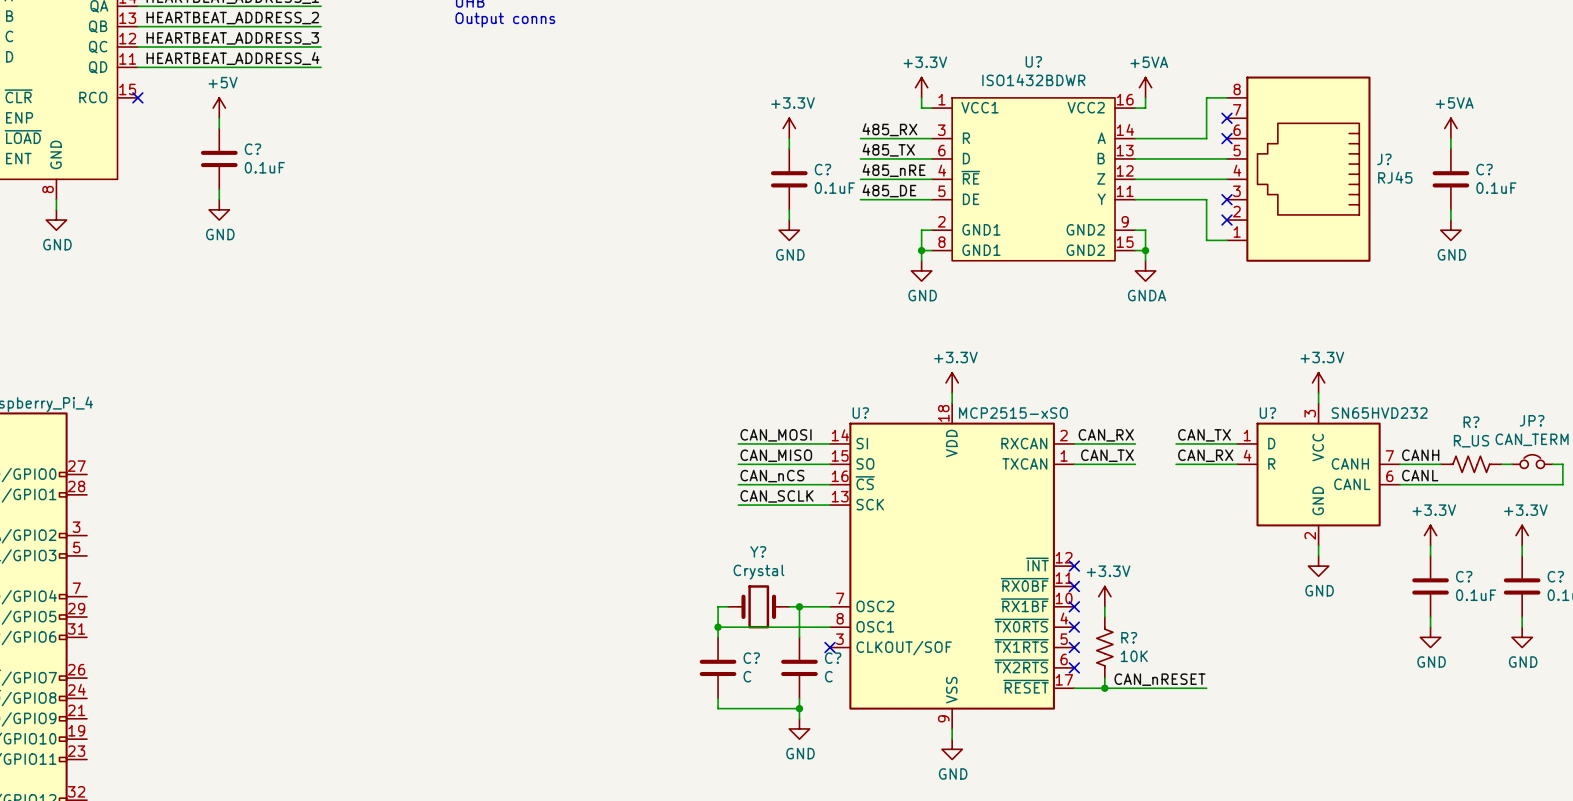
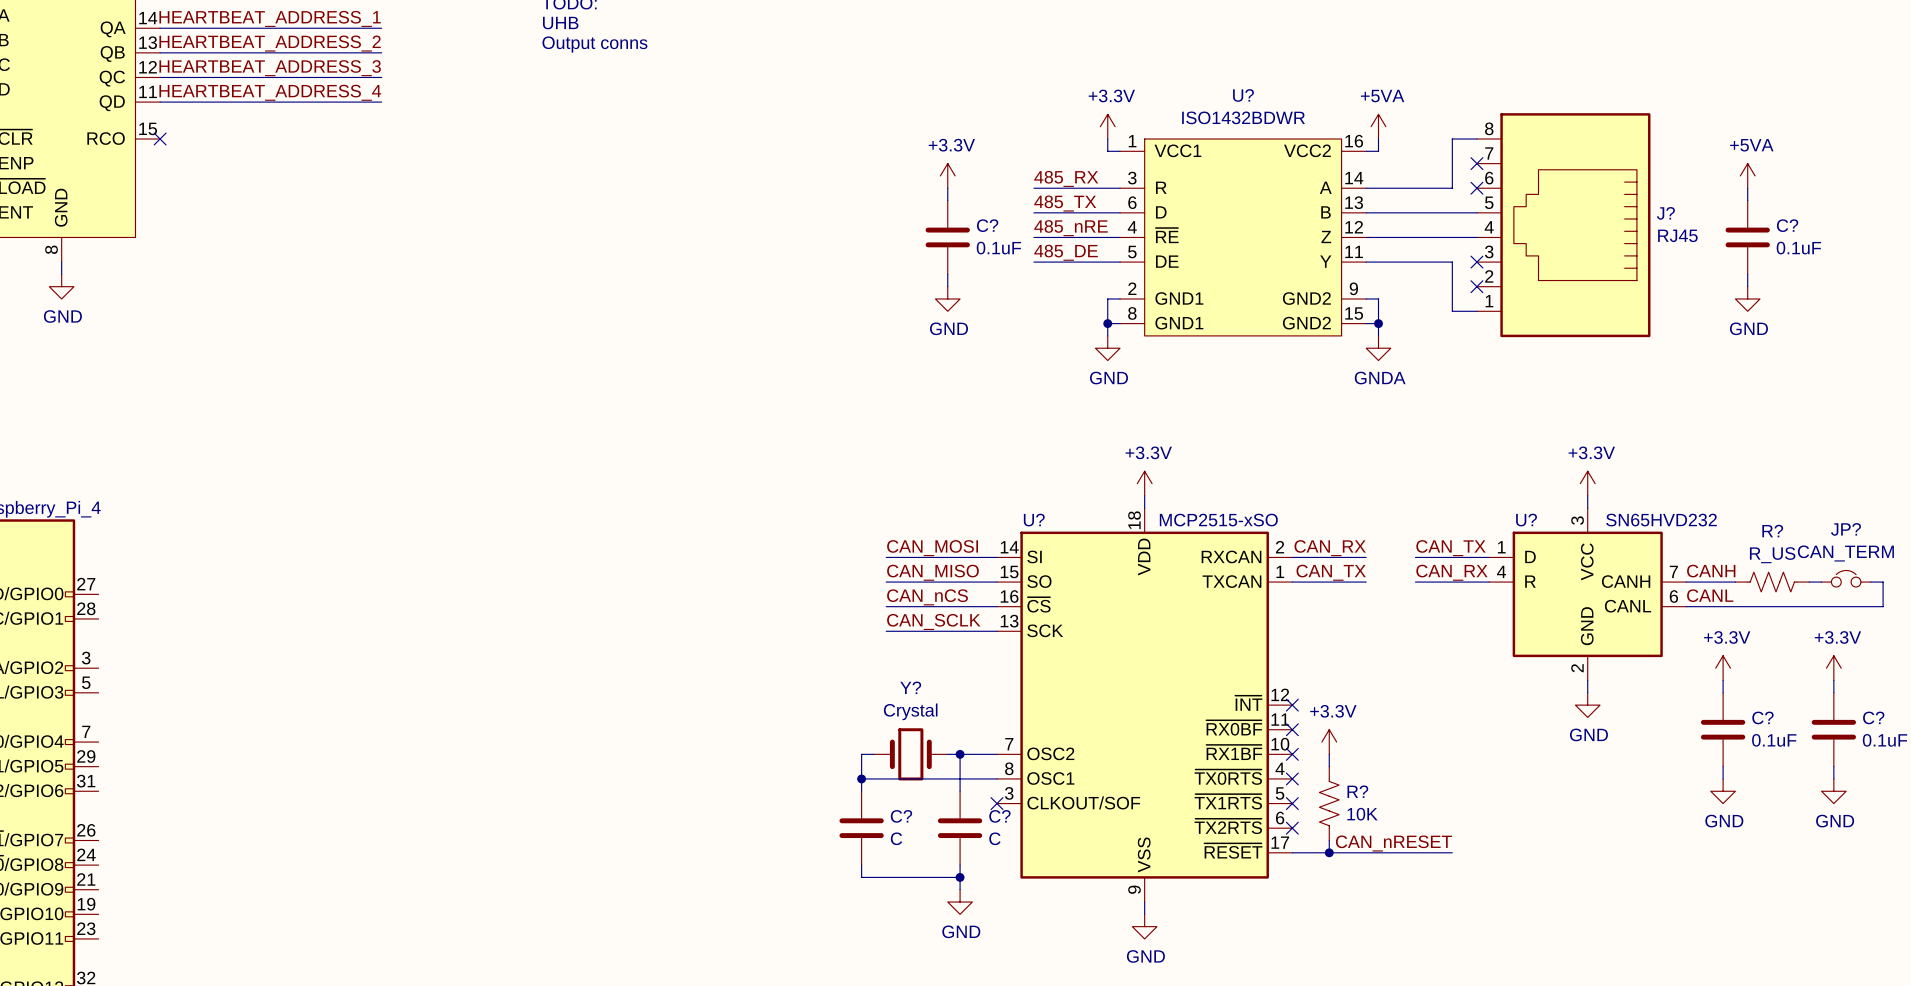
power symbol: +5V (219, 108) -> none
wire: (219, 118) (219, 128) -> none
C?: 0.1uF (219, 158) -> none
wire: (219, 189) (219, 199) -> none
power symbol: GND (219, 209) -> none

